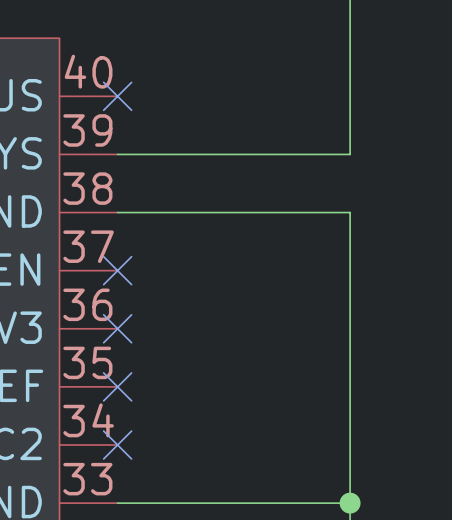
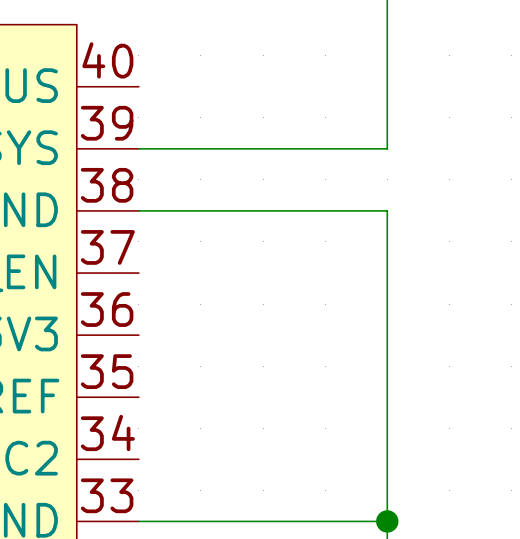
no-connect mark: (117, 96) -> none
no-connect mark: (117, 270) -> none
no-connect mark: (117, 328) -> none
no-connect mark: (117, 386) -> none
no-connect mark: (117, 445) -> none

